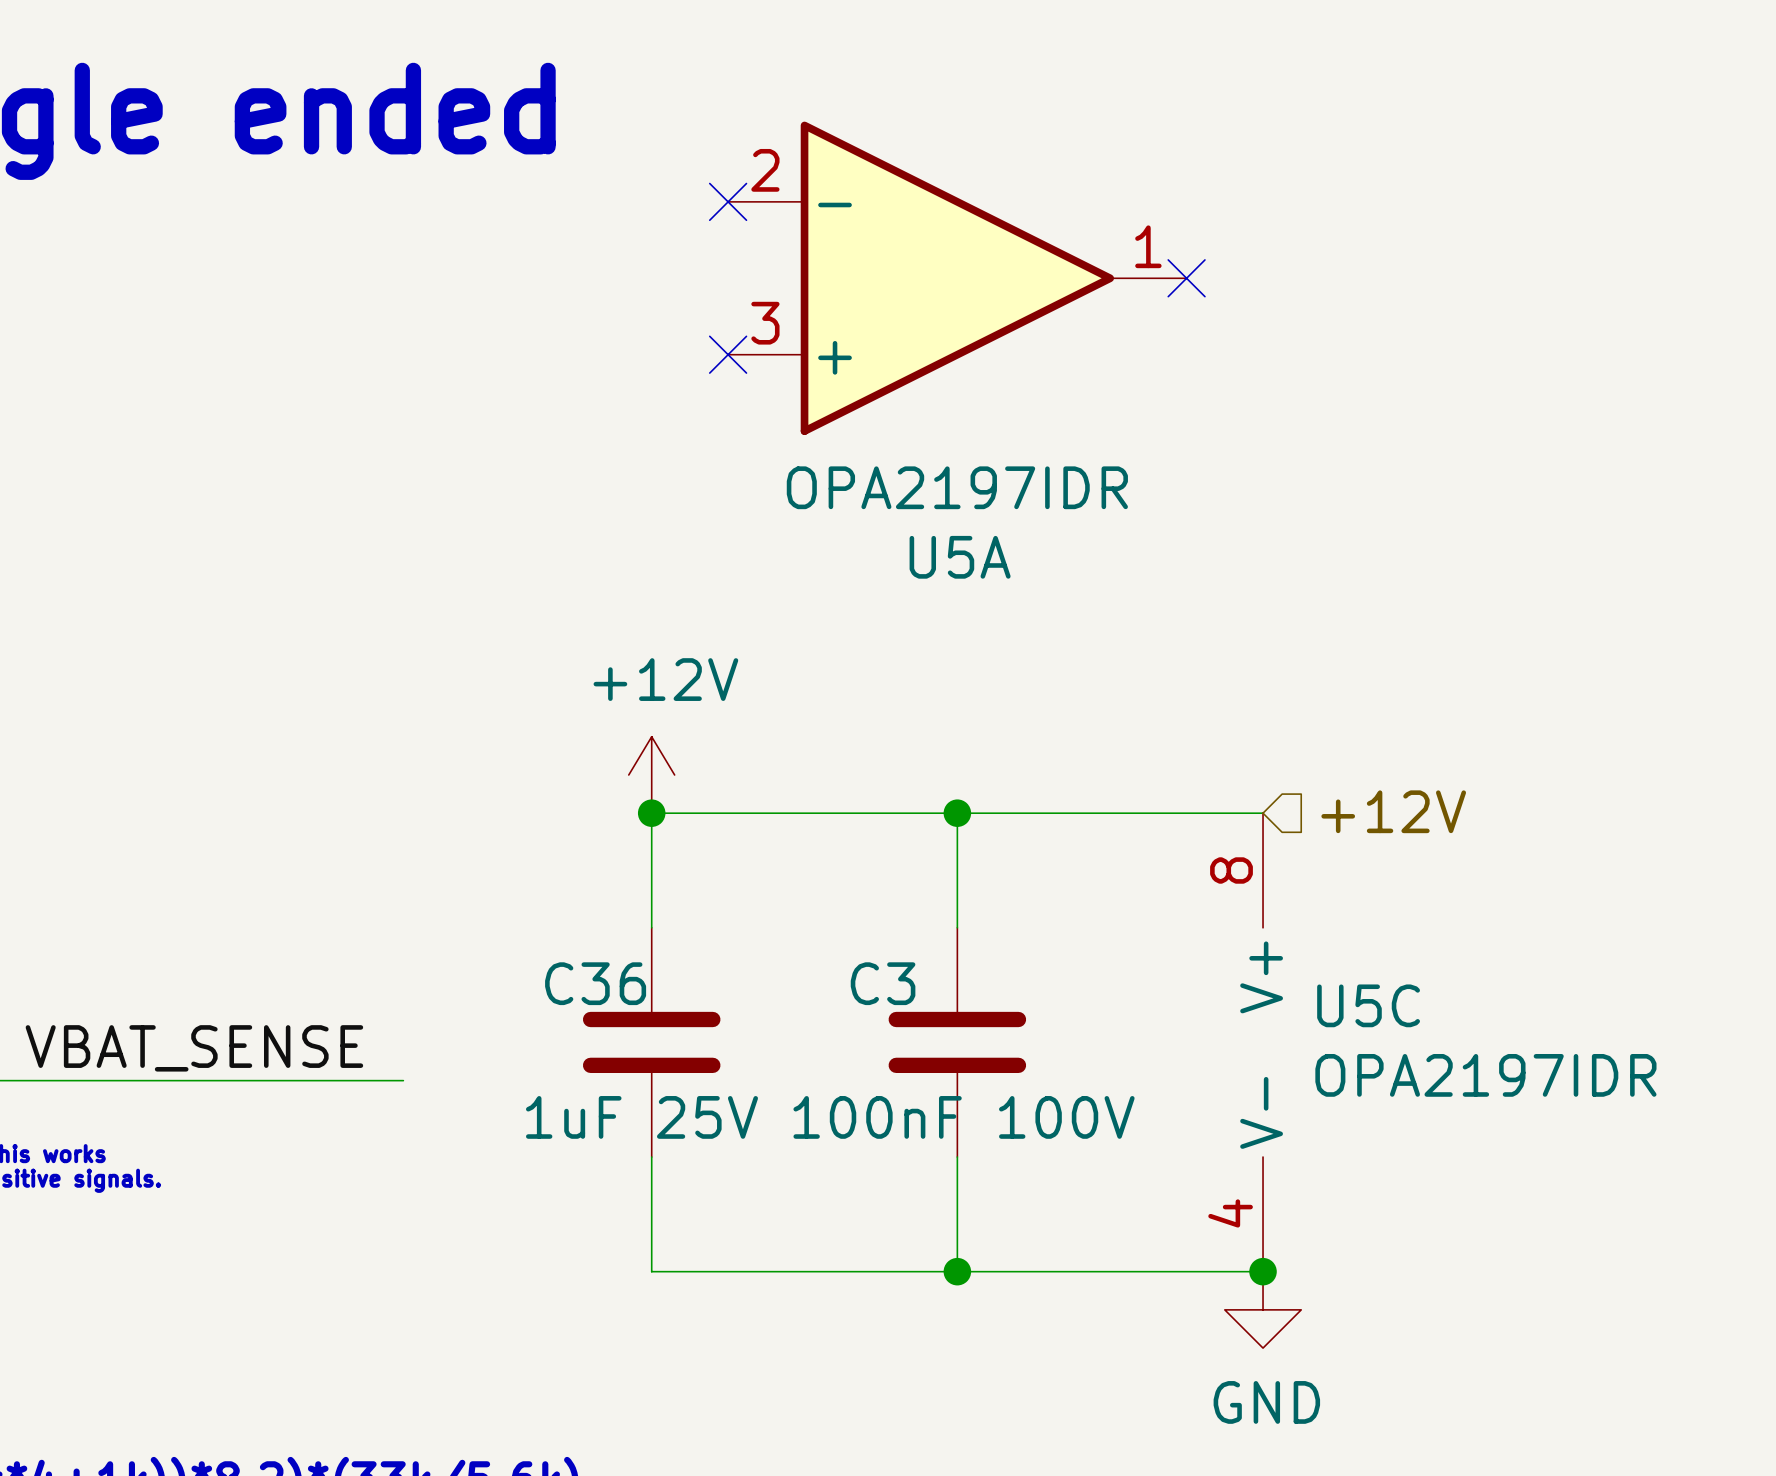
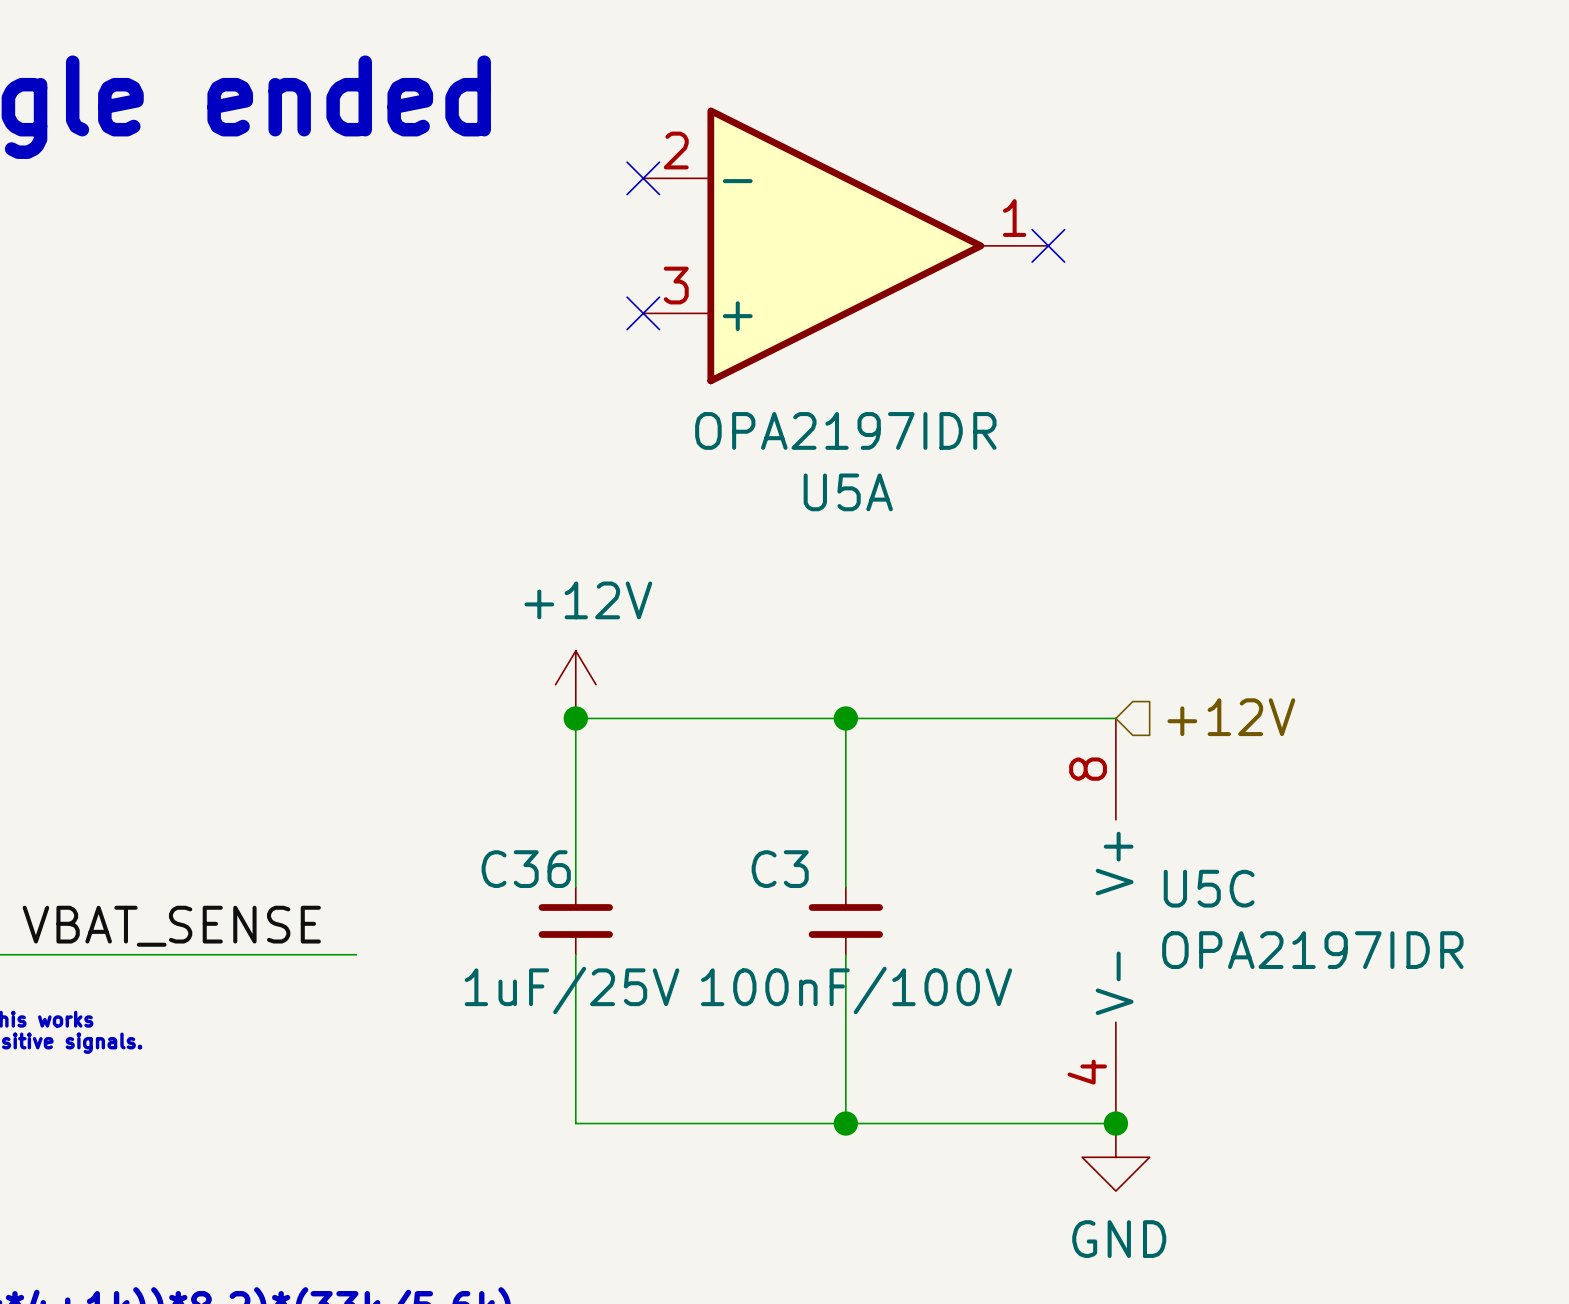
C36 symbol: [582, 927, 721, 1158] -> [538, 887, 613, 955]
C3 symbol: [888, 927, 1027, 1158] -> [808, 887, 883, 955]
C36 value: 1uF 25V (641, 1117) -> 1uF/25V (572, 990)
C3 value: 100nF 100V (964, 1117) -> 100nF/100V (856, 990)

